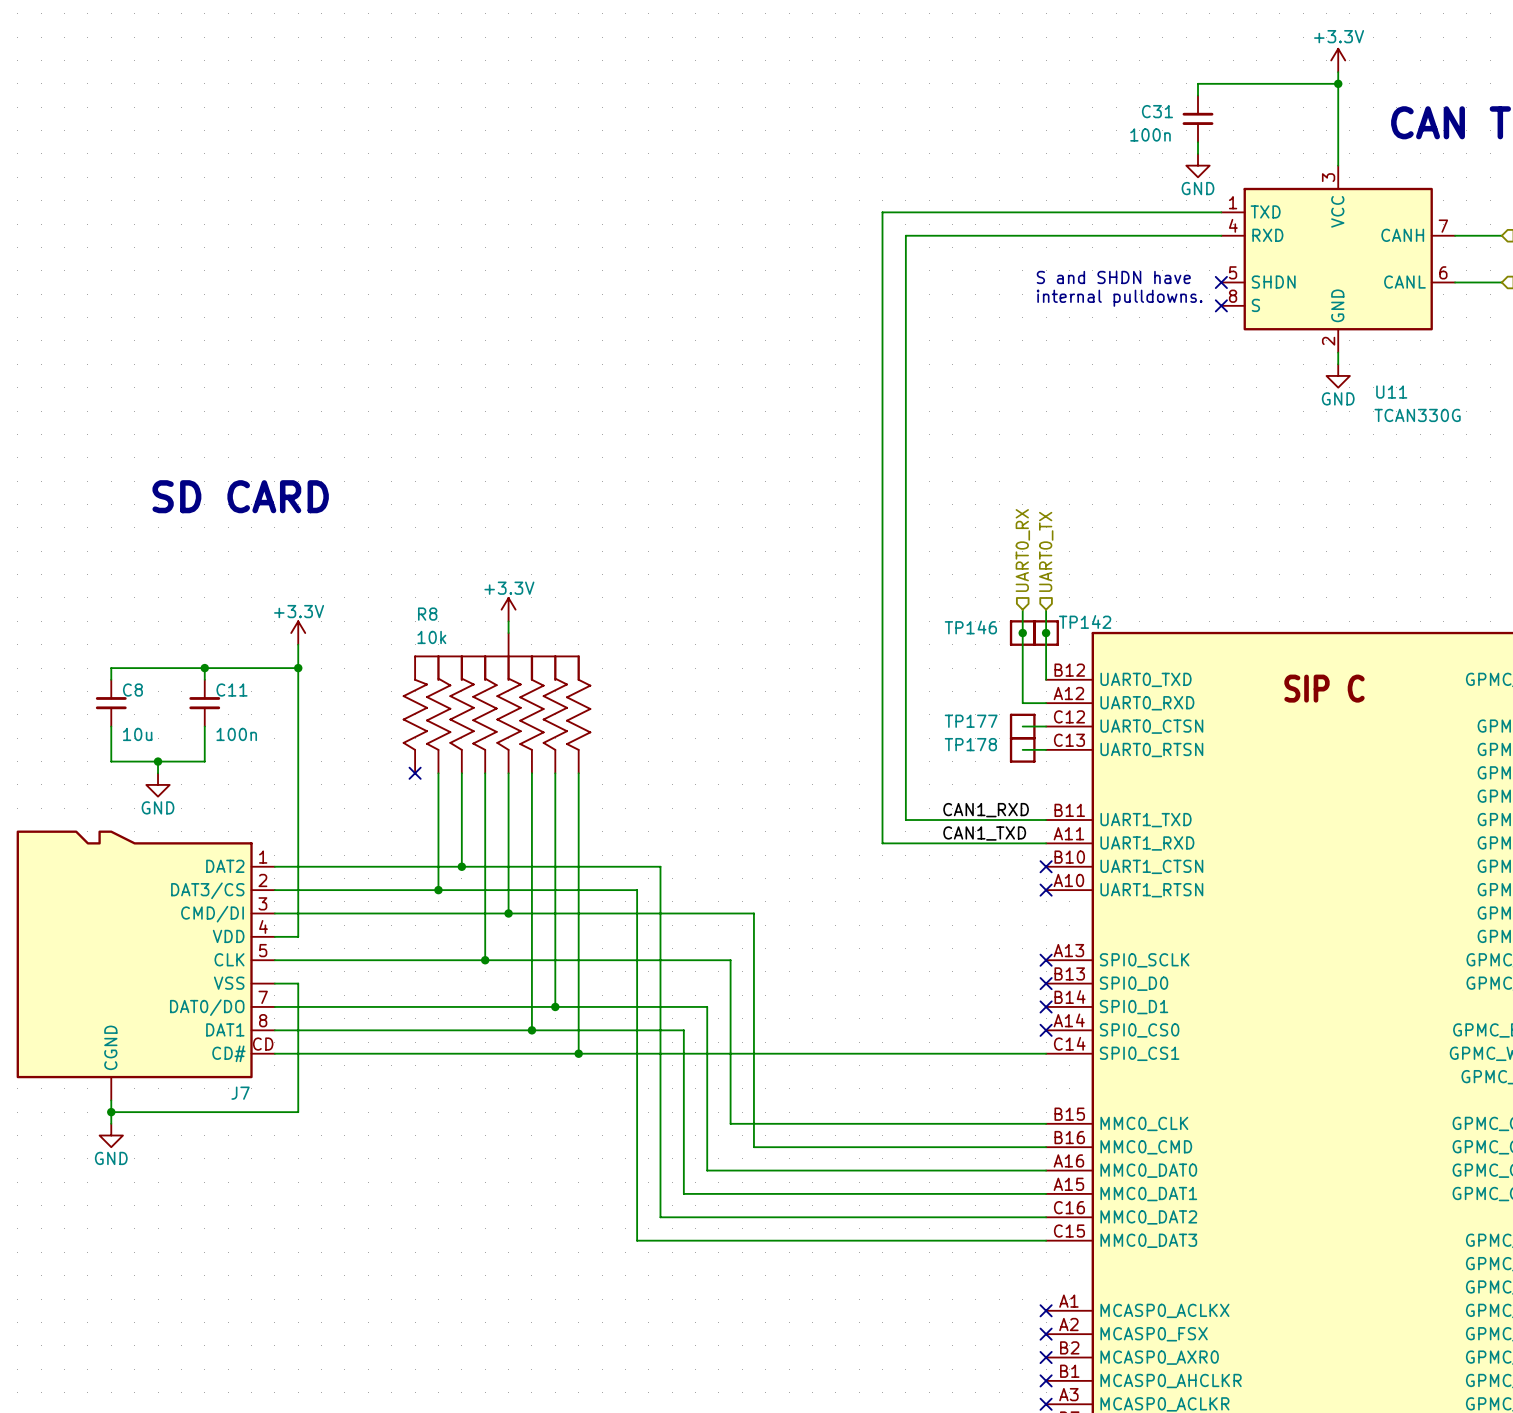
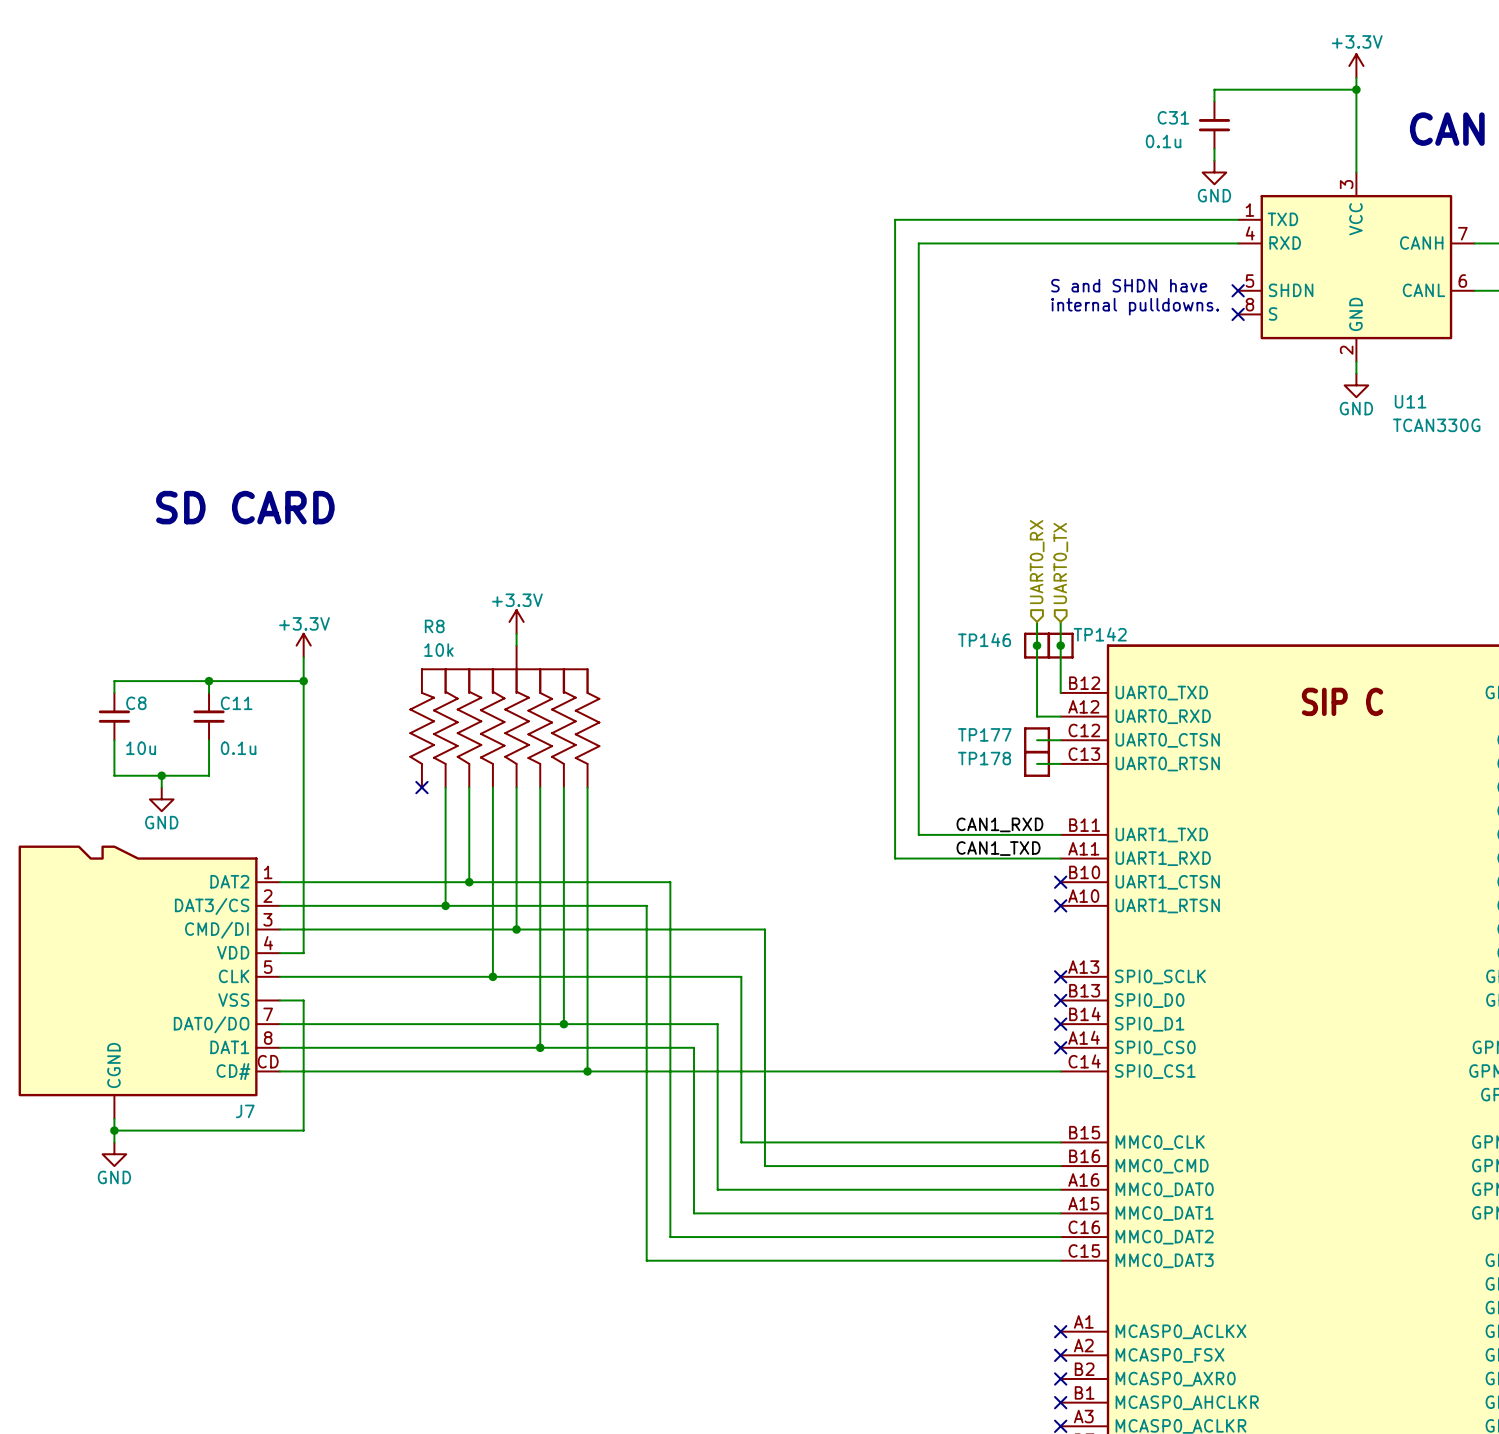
C31 value: 100n (1150, 134) -> 0.1u (1163, 141)
C11 value: 100n (236, 734) -> 0.1u (238, 748)

